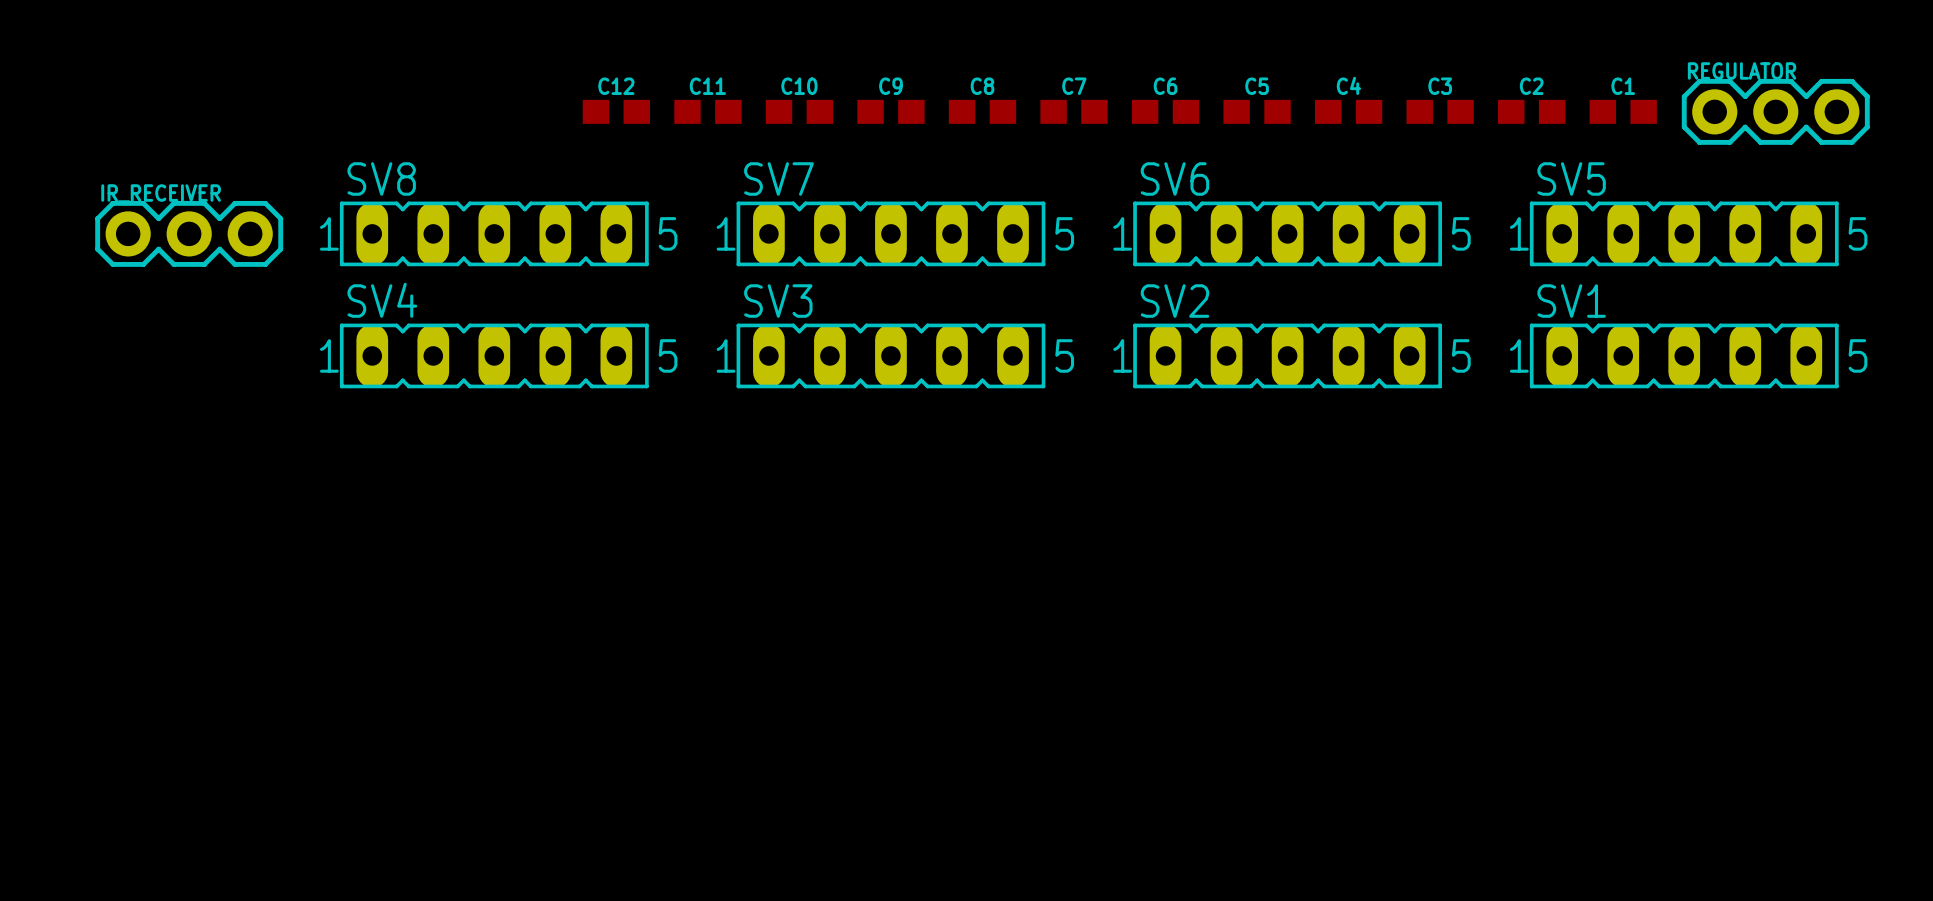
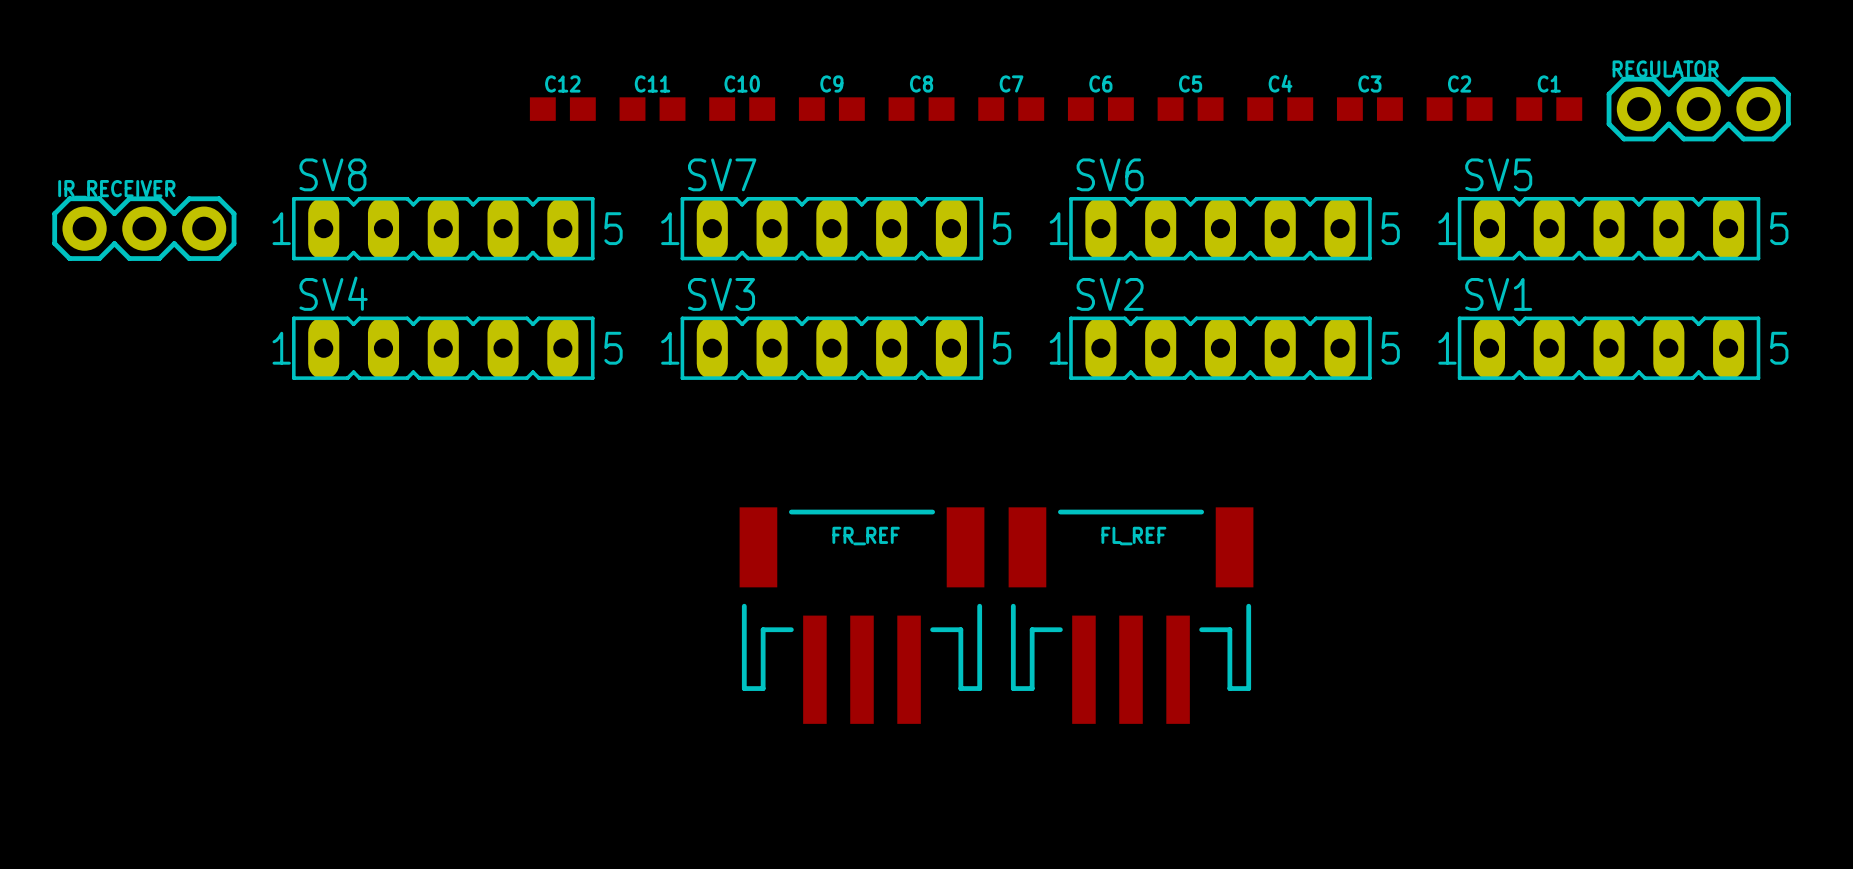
FR_REF: none -> (861, 615)
FL_REF: none -> (1131, 615)

